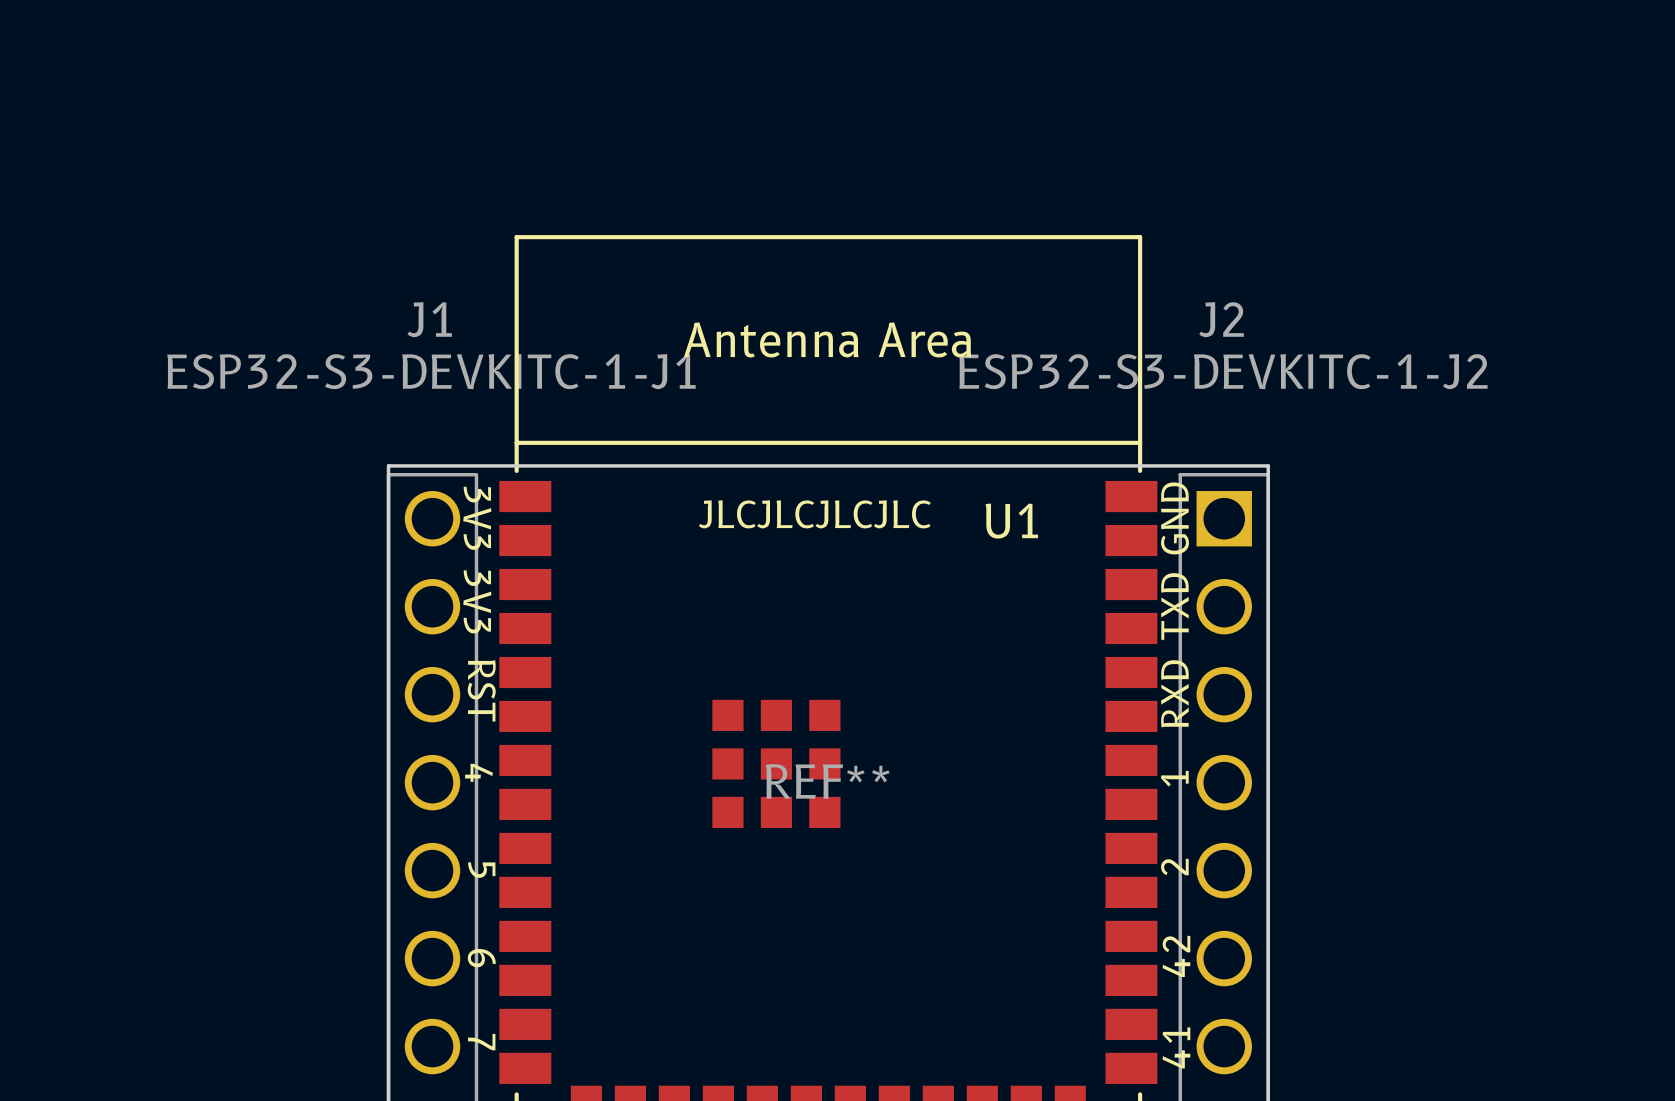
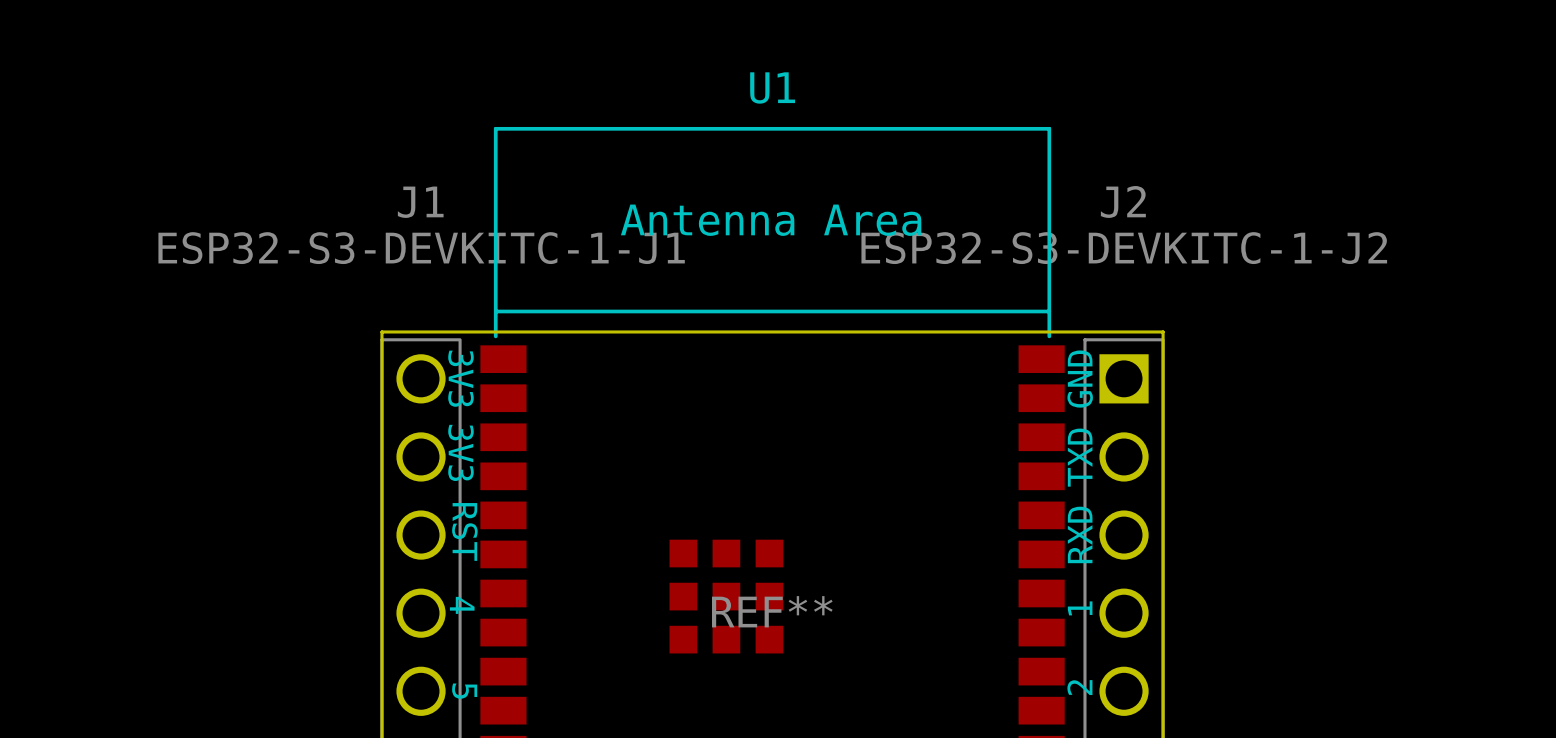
text: JLCJLCJLCJLC (814, 514) -> none
U1 name position: U1 (1011, 521) -> U1 (772, 87)

